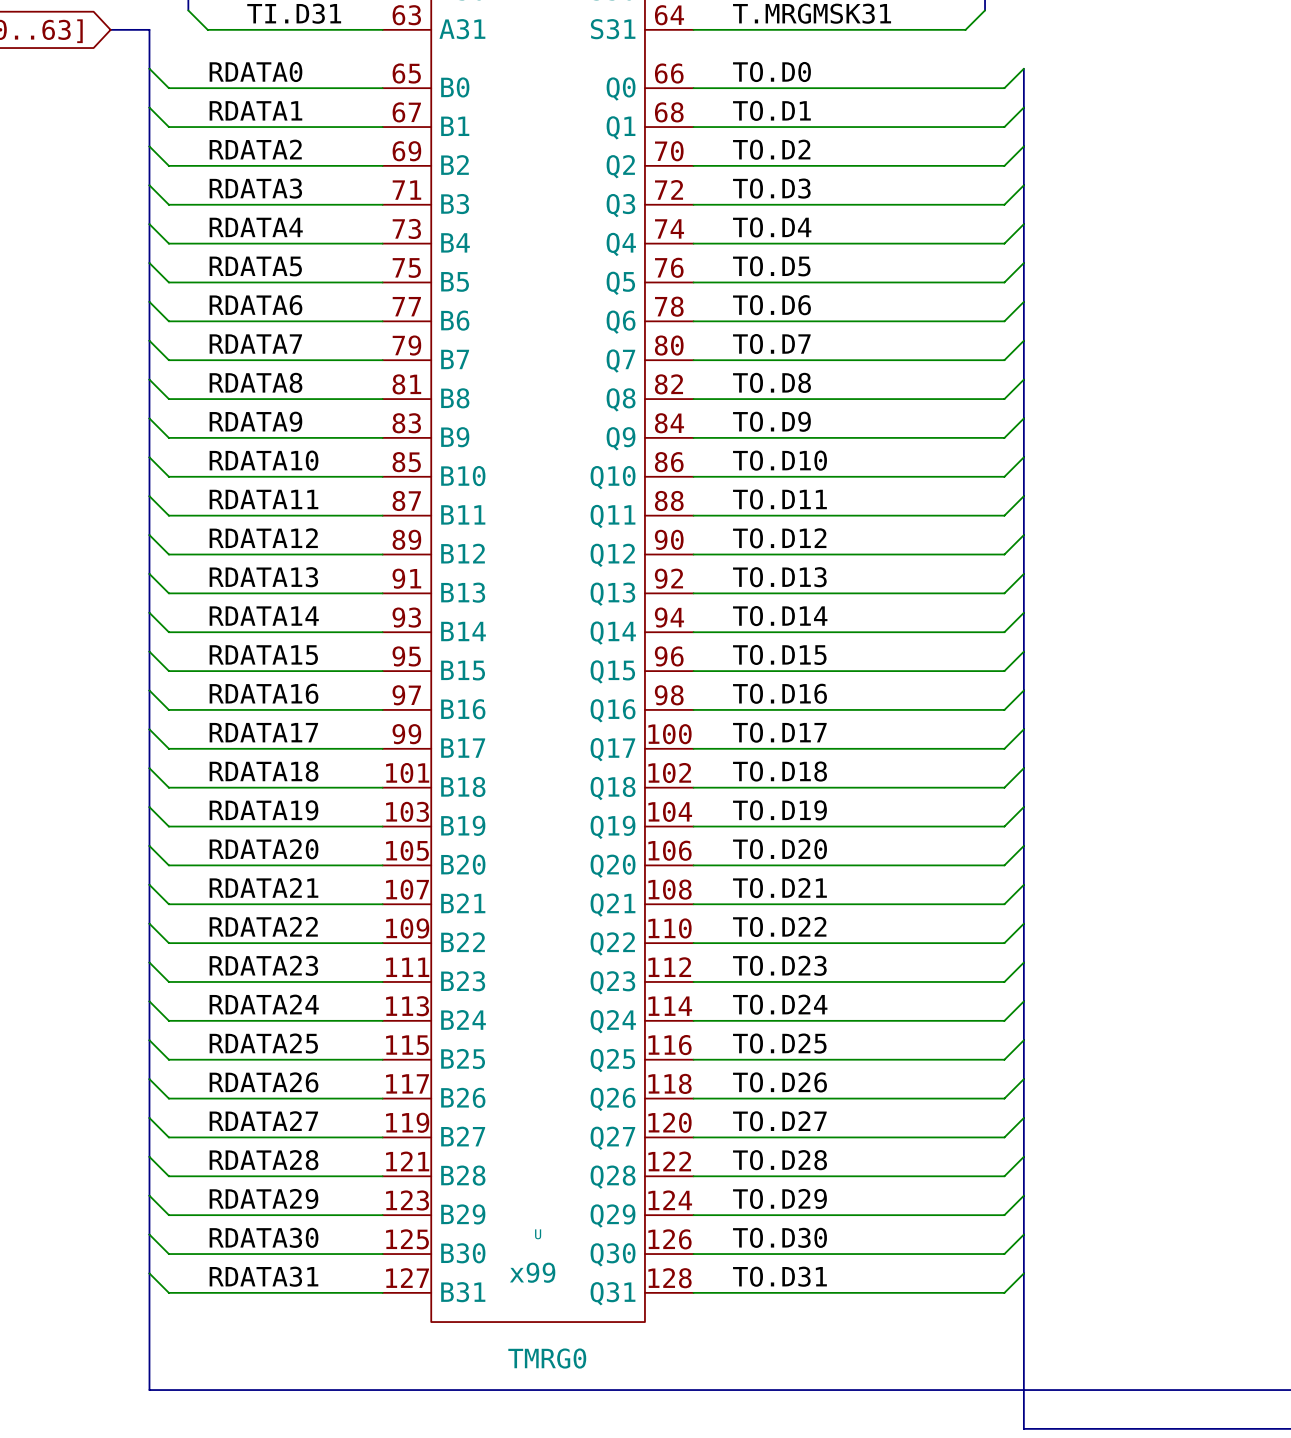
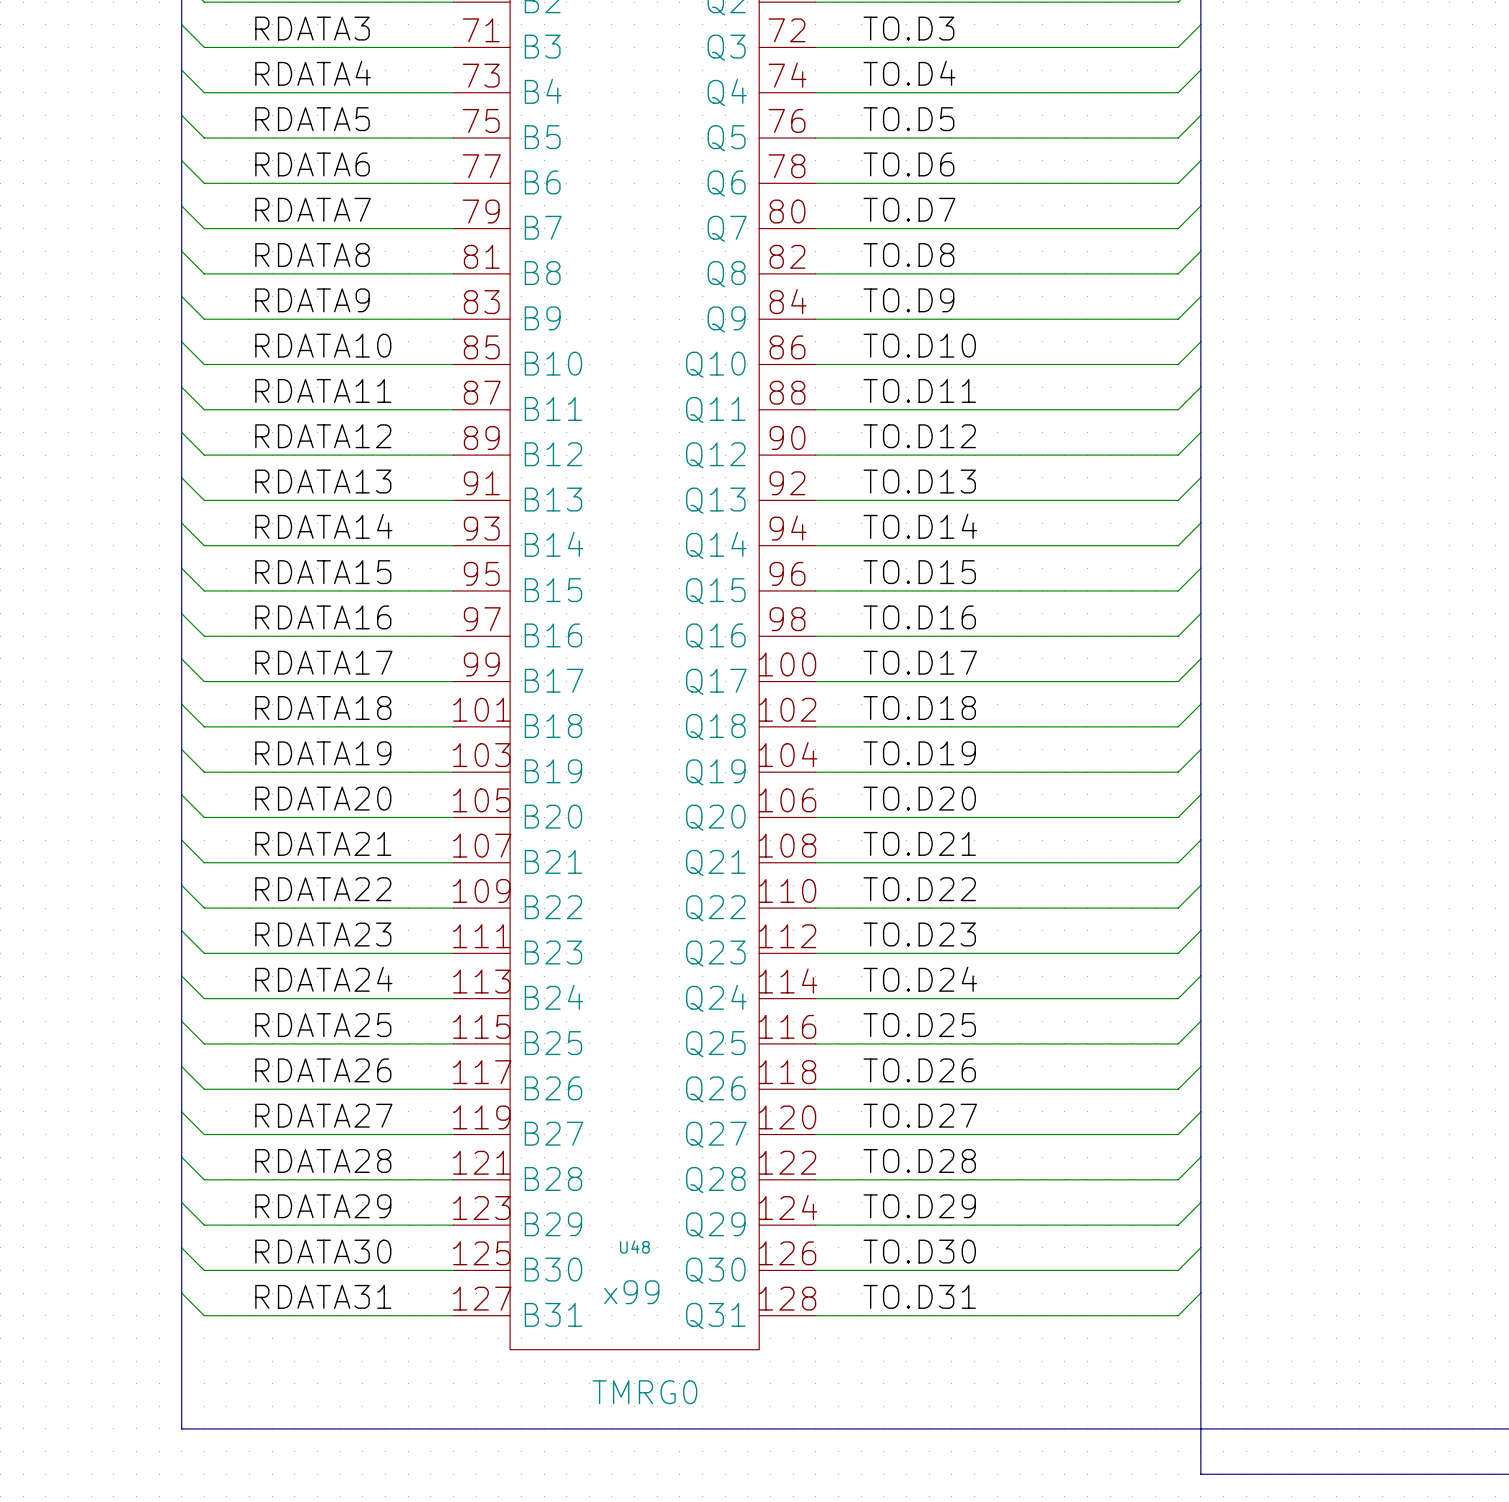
U name: U (538, 1234) -> U48 (634, 1247)

